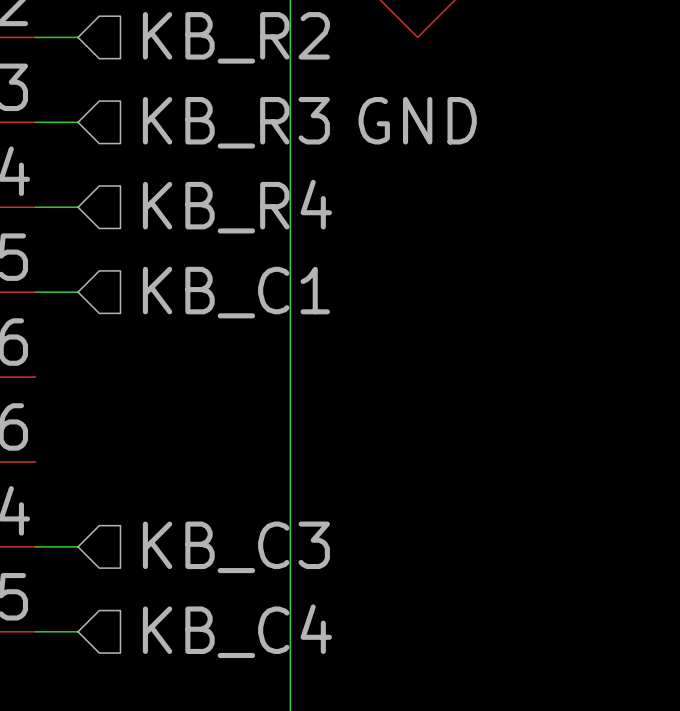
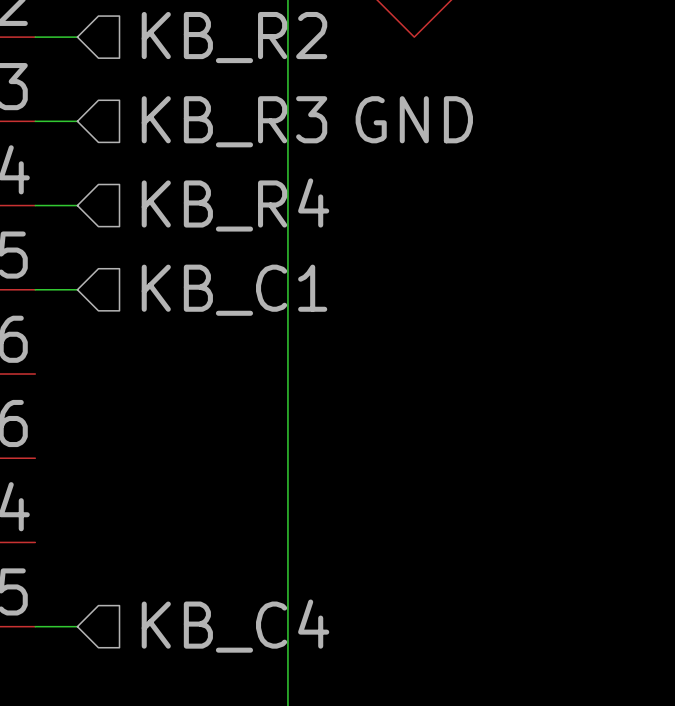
wire: (35, 546) (78, 546) -> none
hierarchical label: KB_C3 (236, 547) -> none

